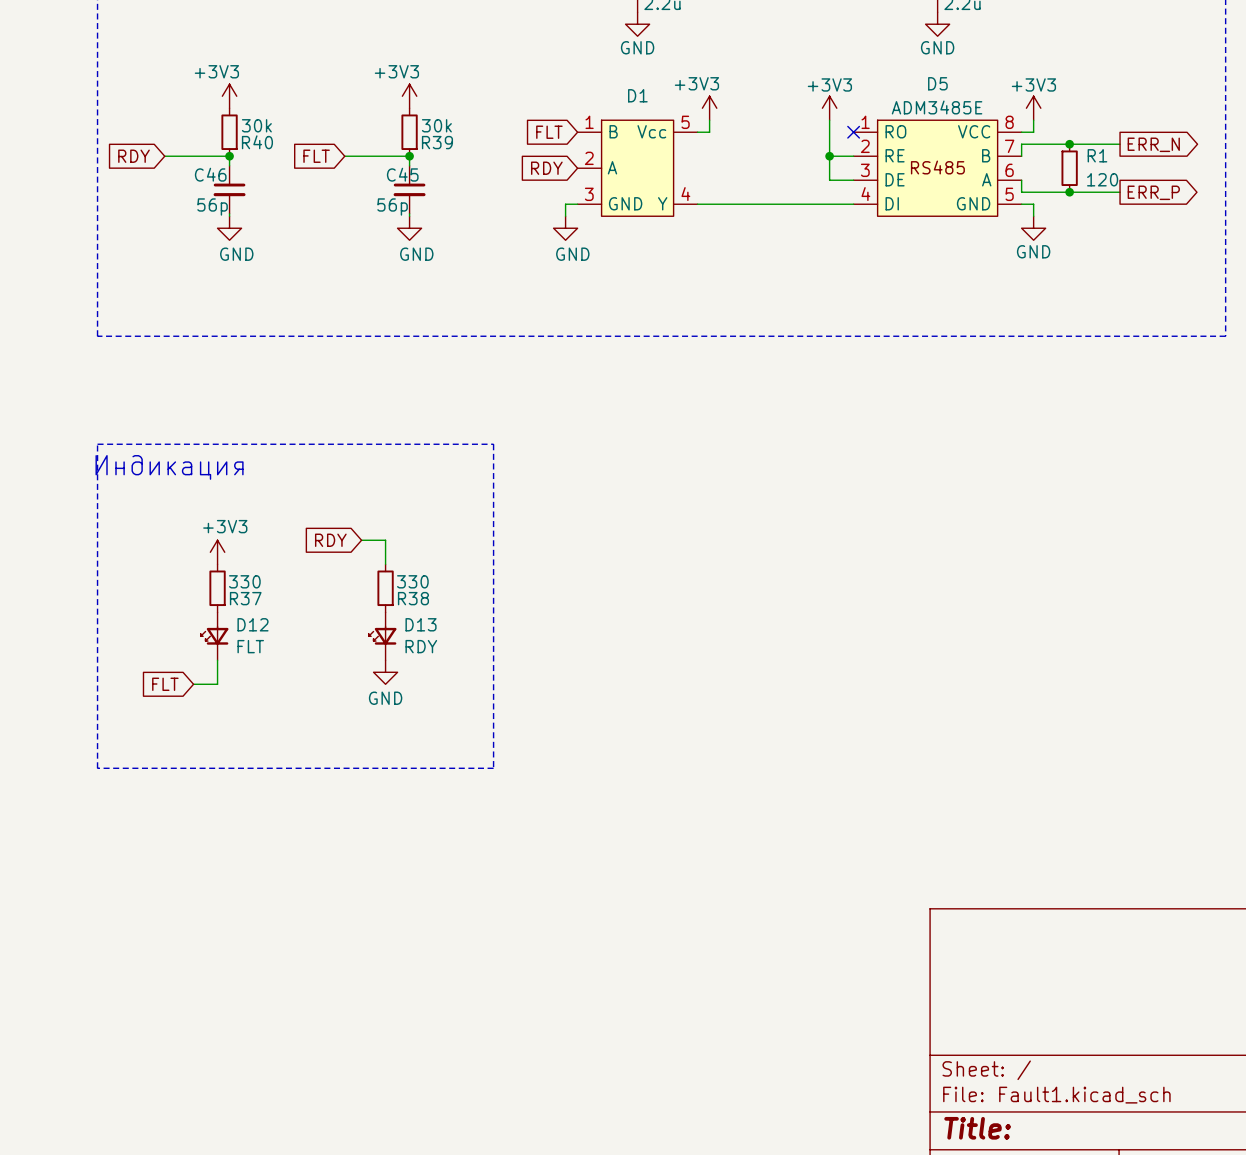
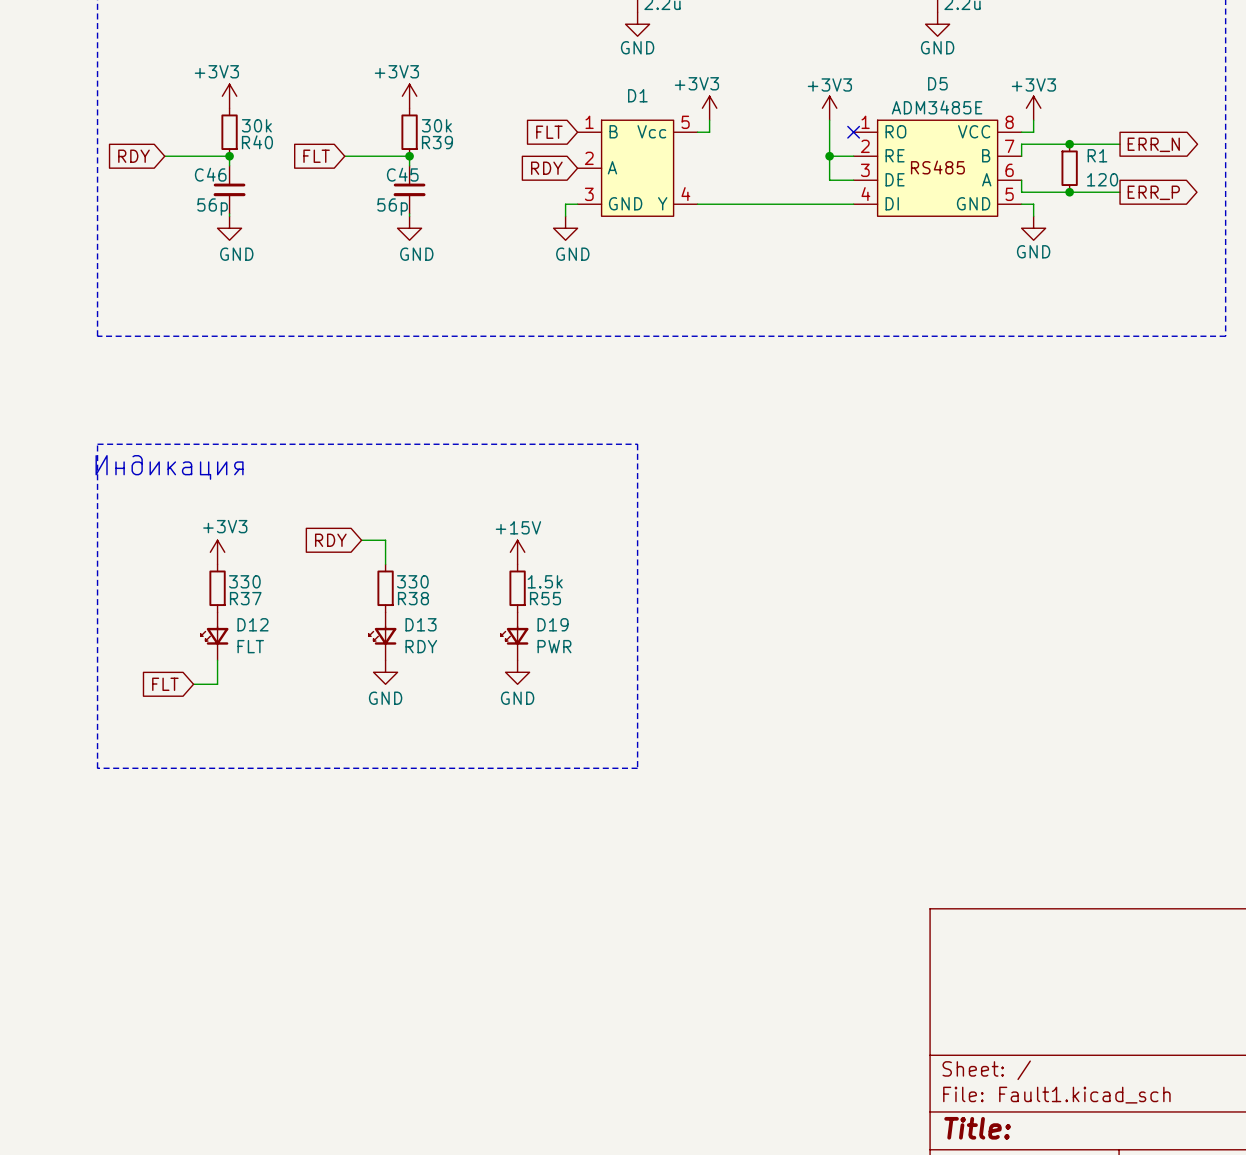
line: (493, 444) (493, 768) -> (493, 444) (637, 444) (637, 768) (493, 768)
power symbol: none -> +15V (517, 552)
R55: none -> 1.5k (517, 588)
D19: none -> PWR (514, 636)
power symbol: none -> GND (517, 672)

